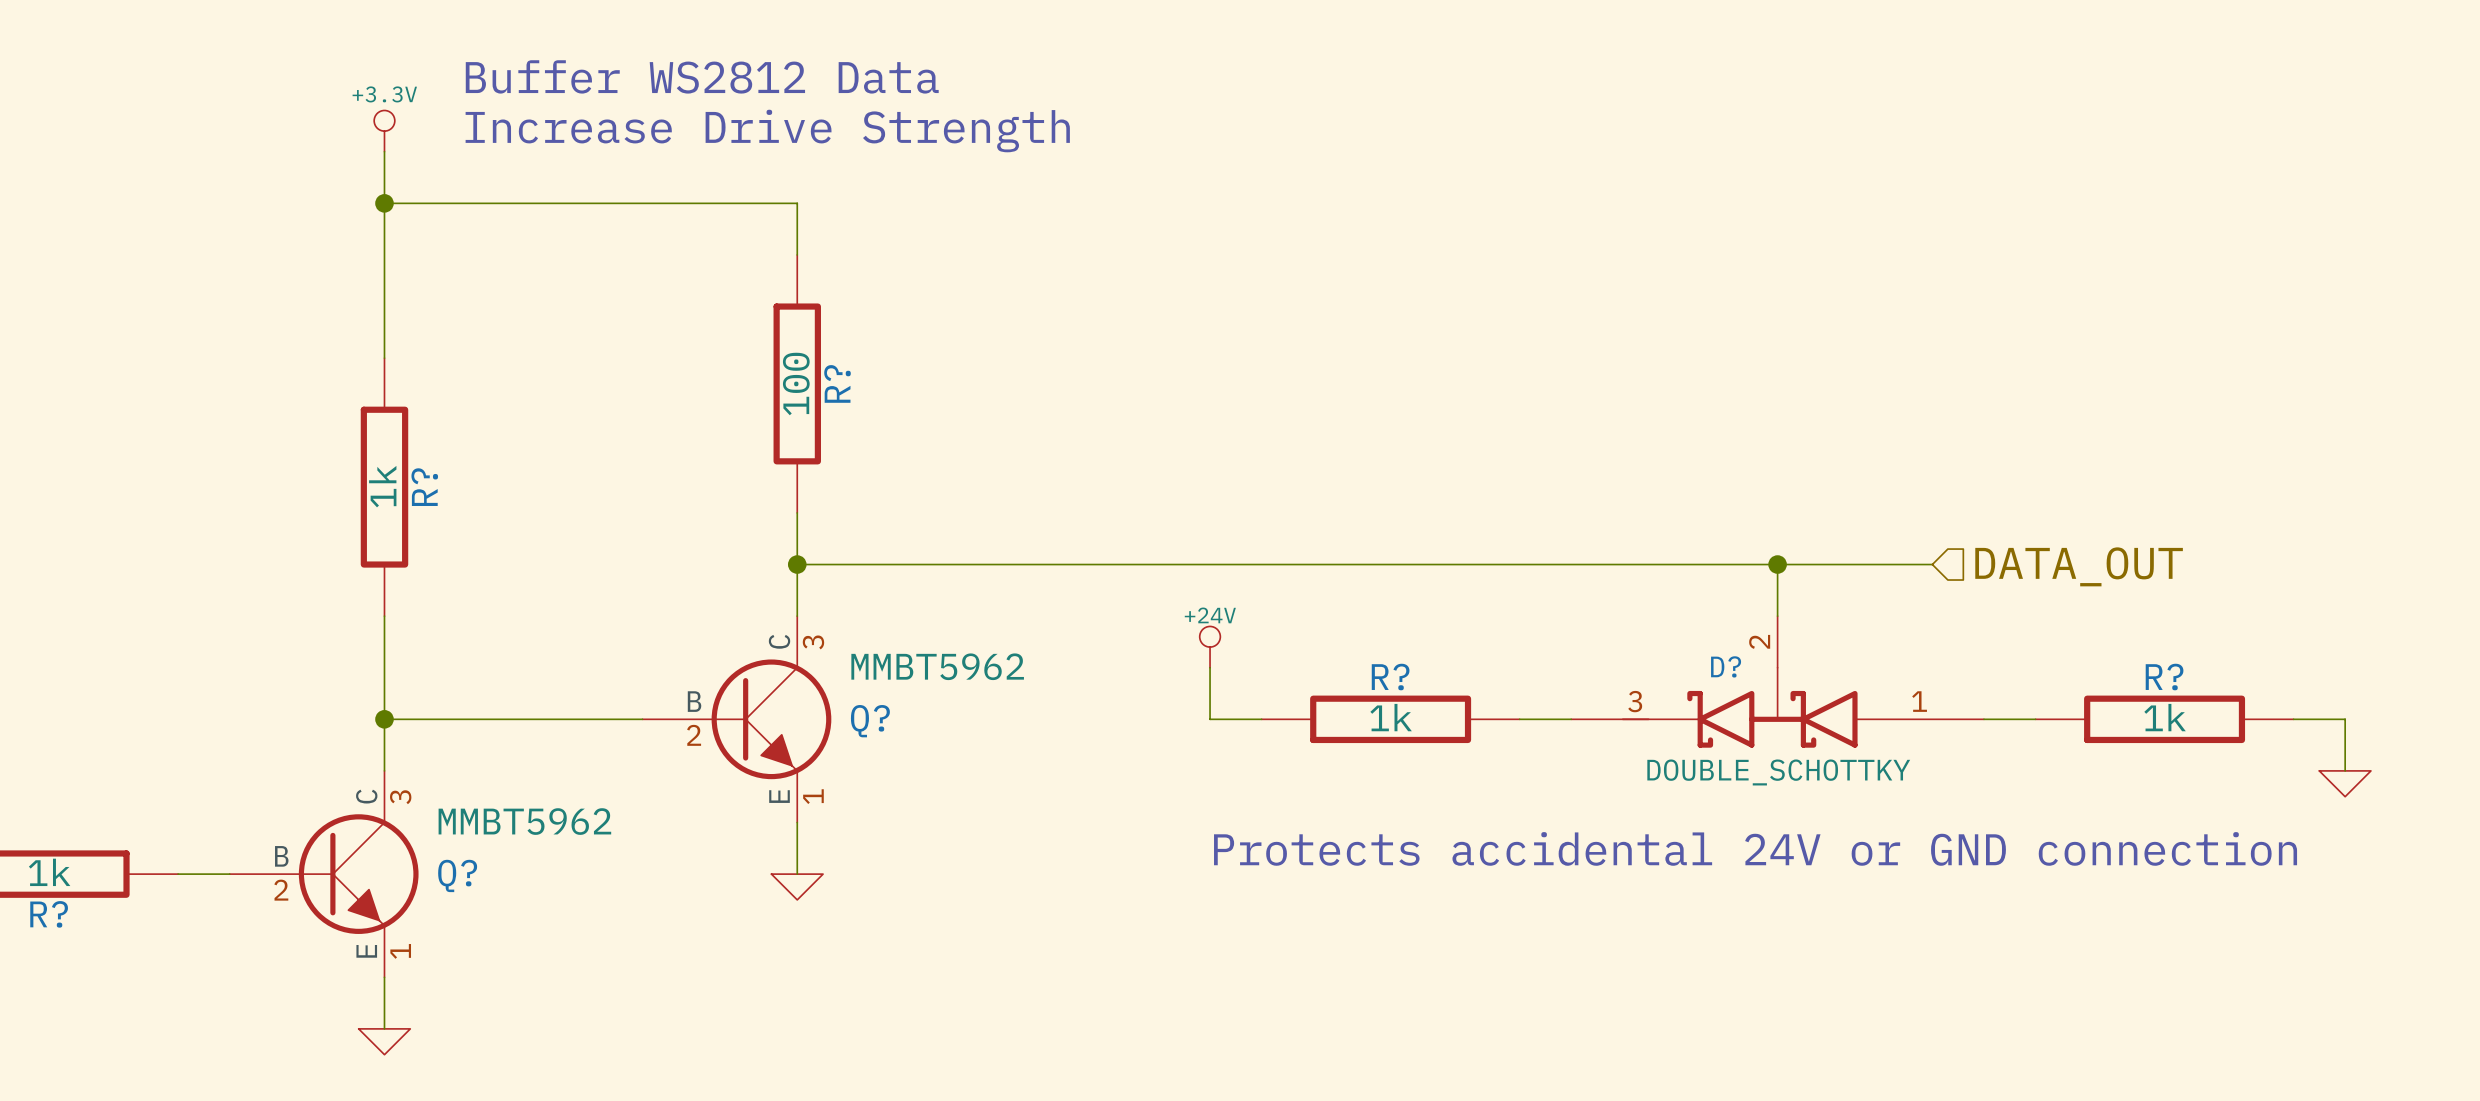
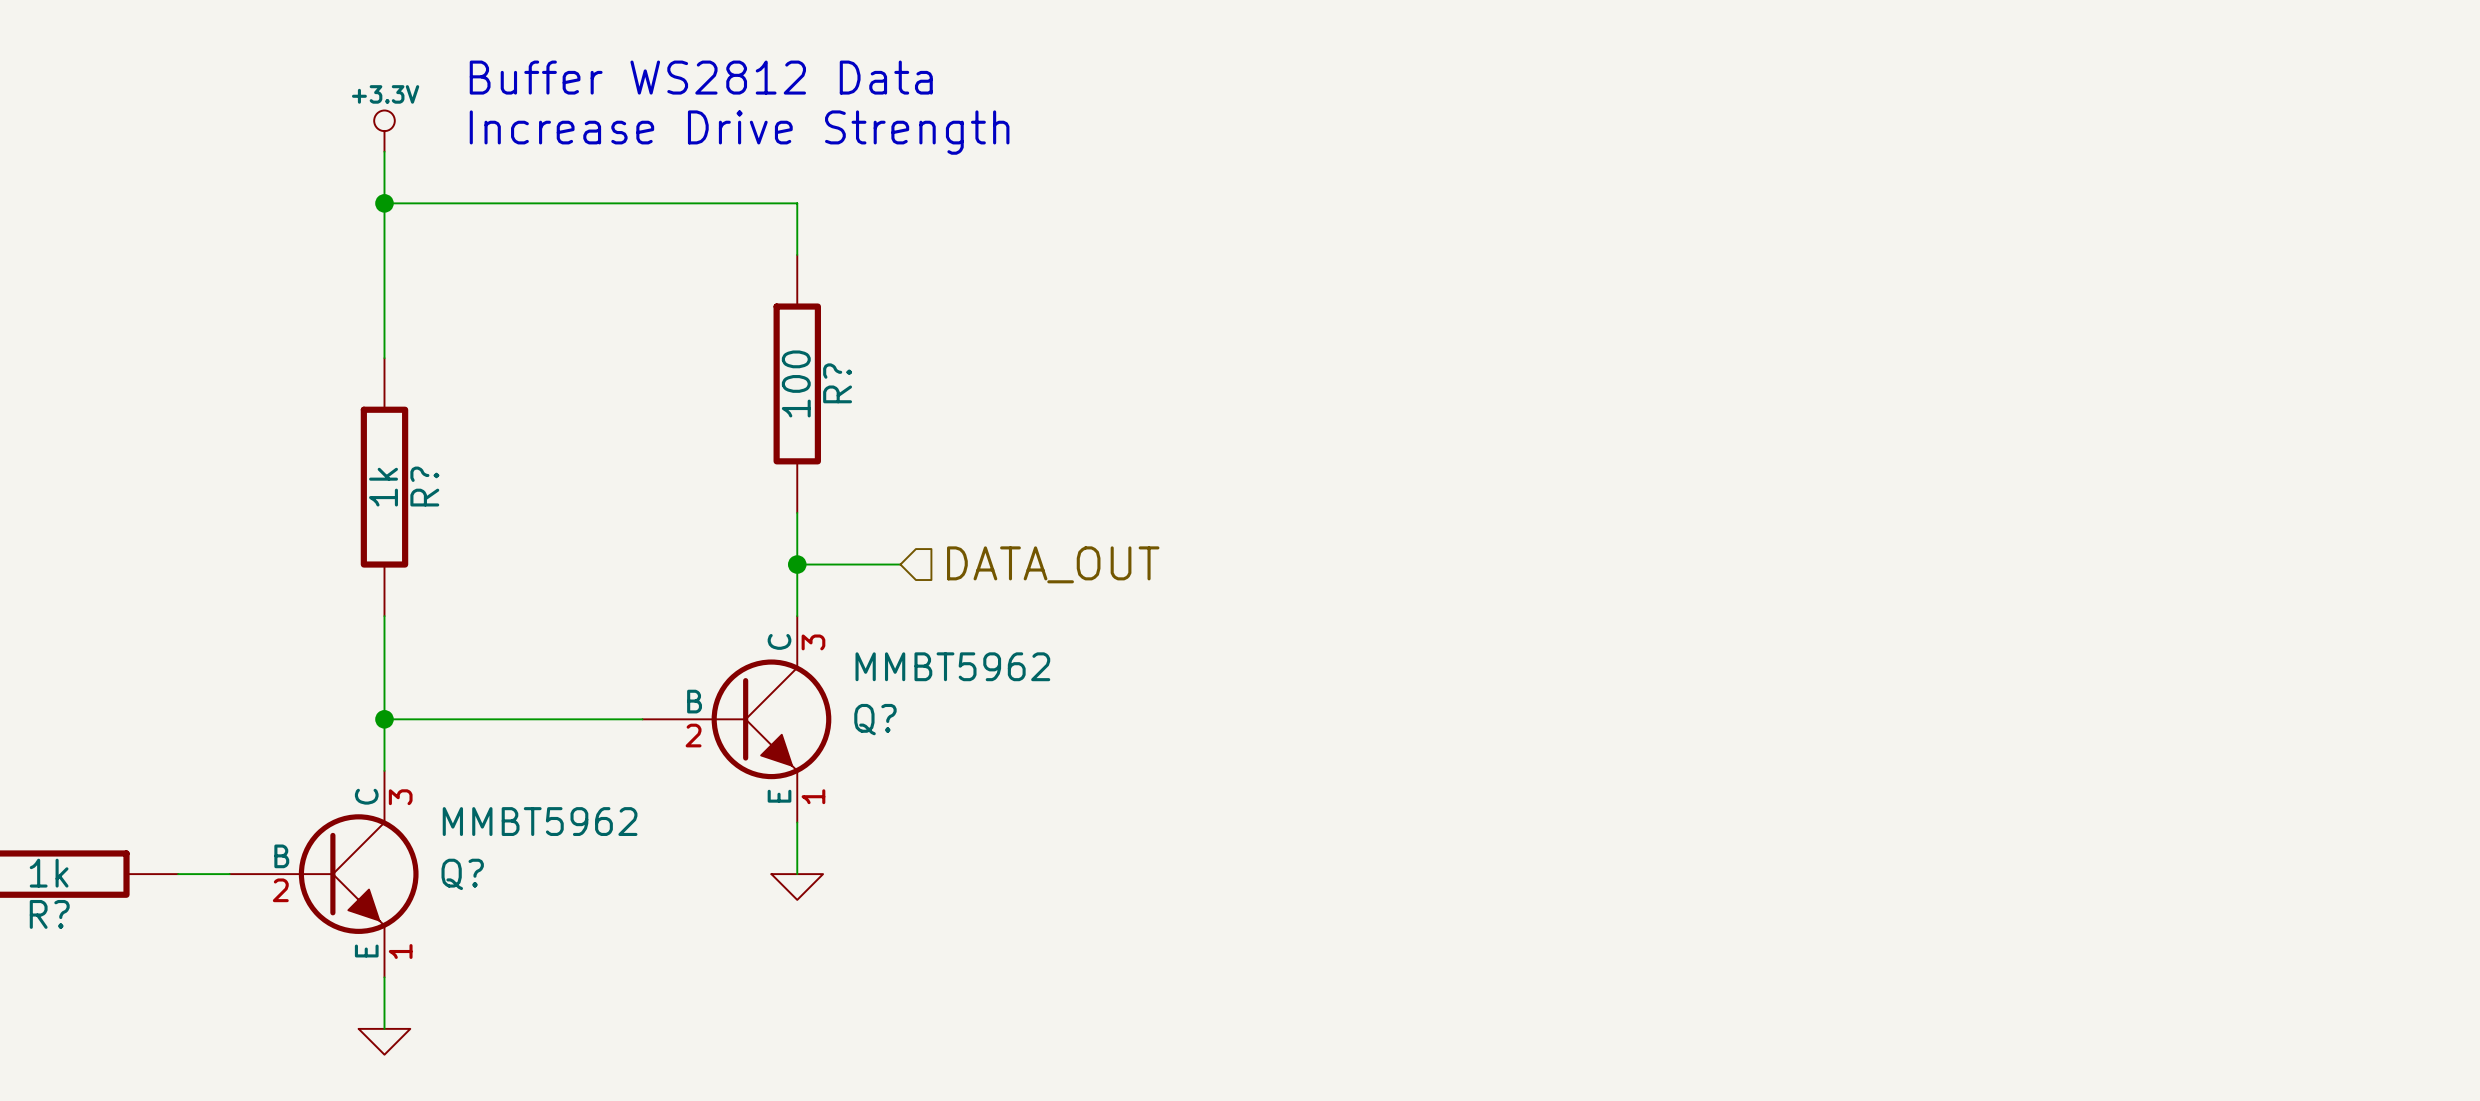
wire: (900, 564) (1932, 564) -> none
wire: (1777, 564) (1777, 616) -> none
junction: (1777, 564) -> none
hierarchical label: none -> DATA_OUT (1053, 564)
hierarchical label: DATA_OUT (2079, 566) -> none
power symbol: +24V (1210, 647) -> none
wire: (1210, 667) (1210, 719) (1261, 719) -> none
D?: DOUBLE_SCHOTTKY (1777, 681) -> none
R?: 1k (1390, 719) -> none
wire: (1519, 719) (1571, 719) -> none
wire: (1983, 719) (2035, 719) -> none
R?: 1k (2164, 719) -> none
wire: (2293, 719) (2345, 719) (2345, 770) -> none
power symbol: (2345, 783) -> none
text: Protects accidental 24V or GND connection (1755, 848) -> none

